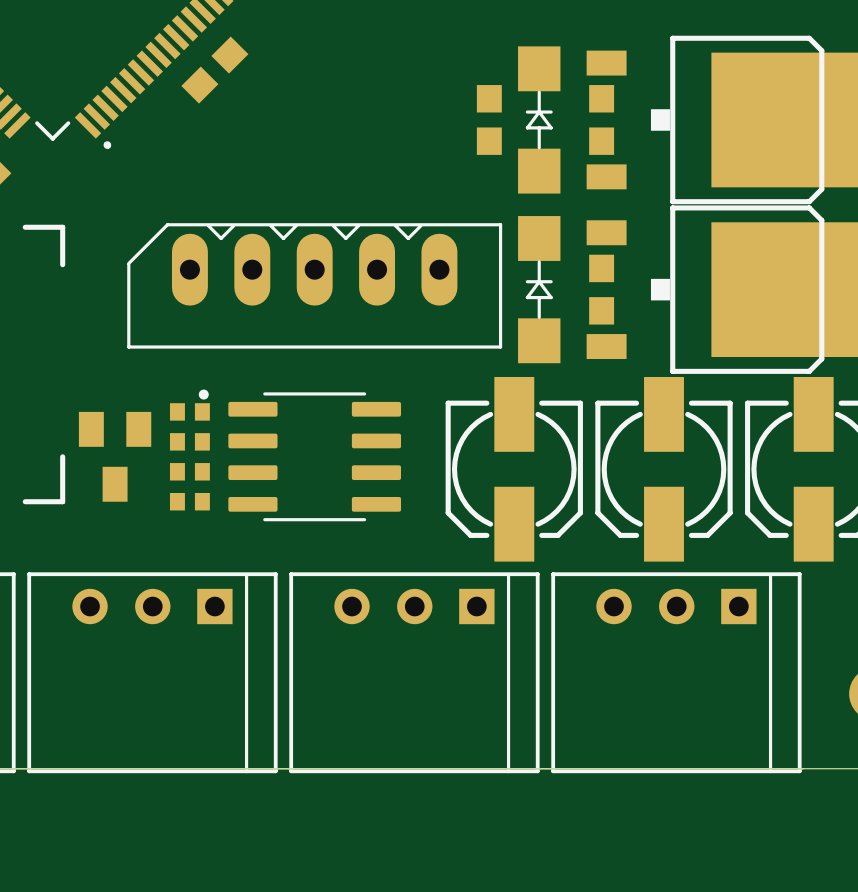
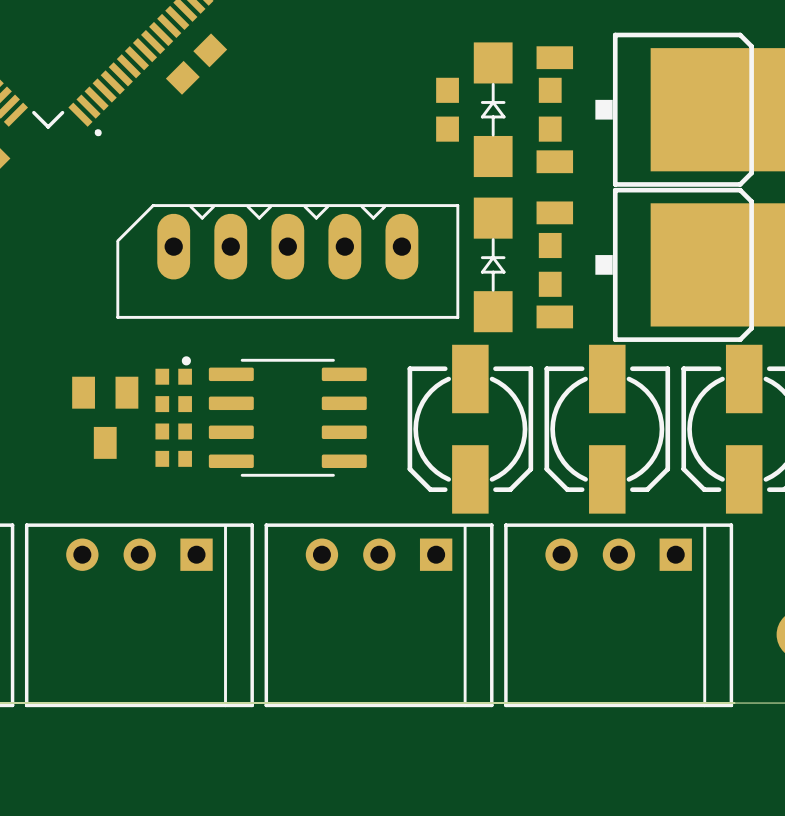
line: (25, 227) (62, 227) (62, 264) -> none
line: (62, 456) (62, 501) (25, 501) -> none

